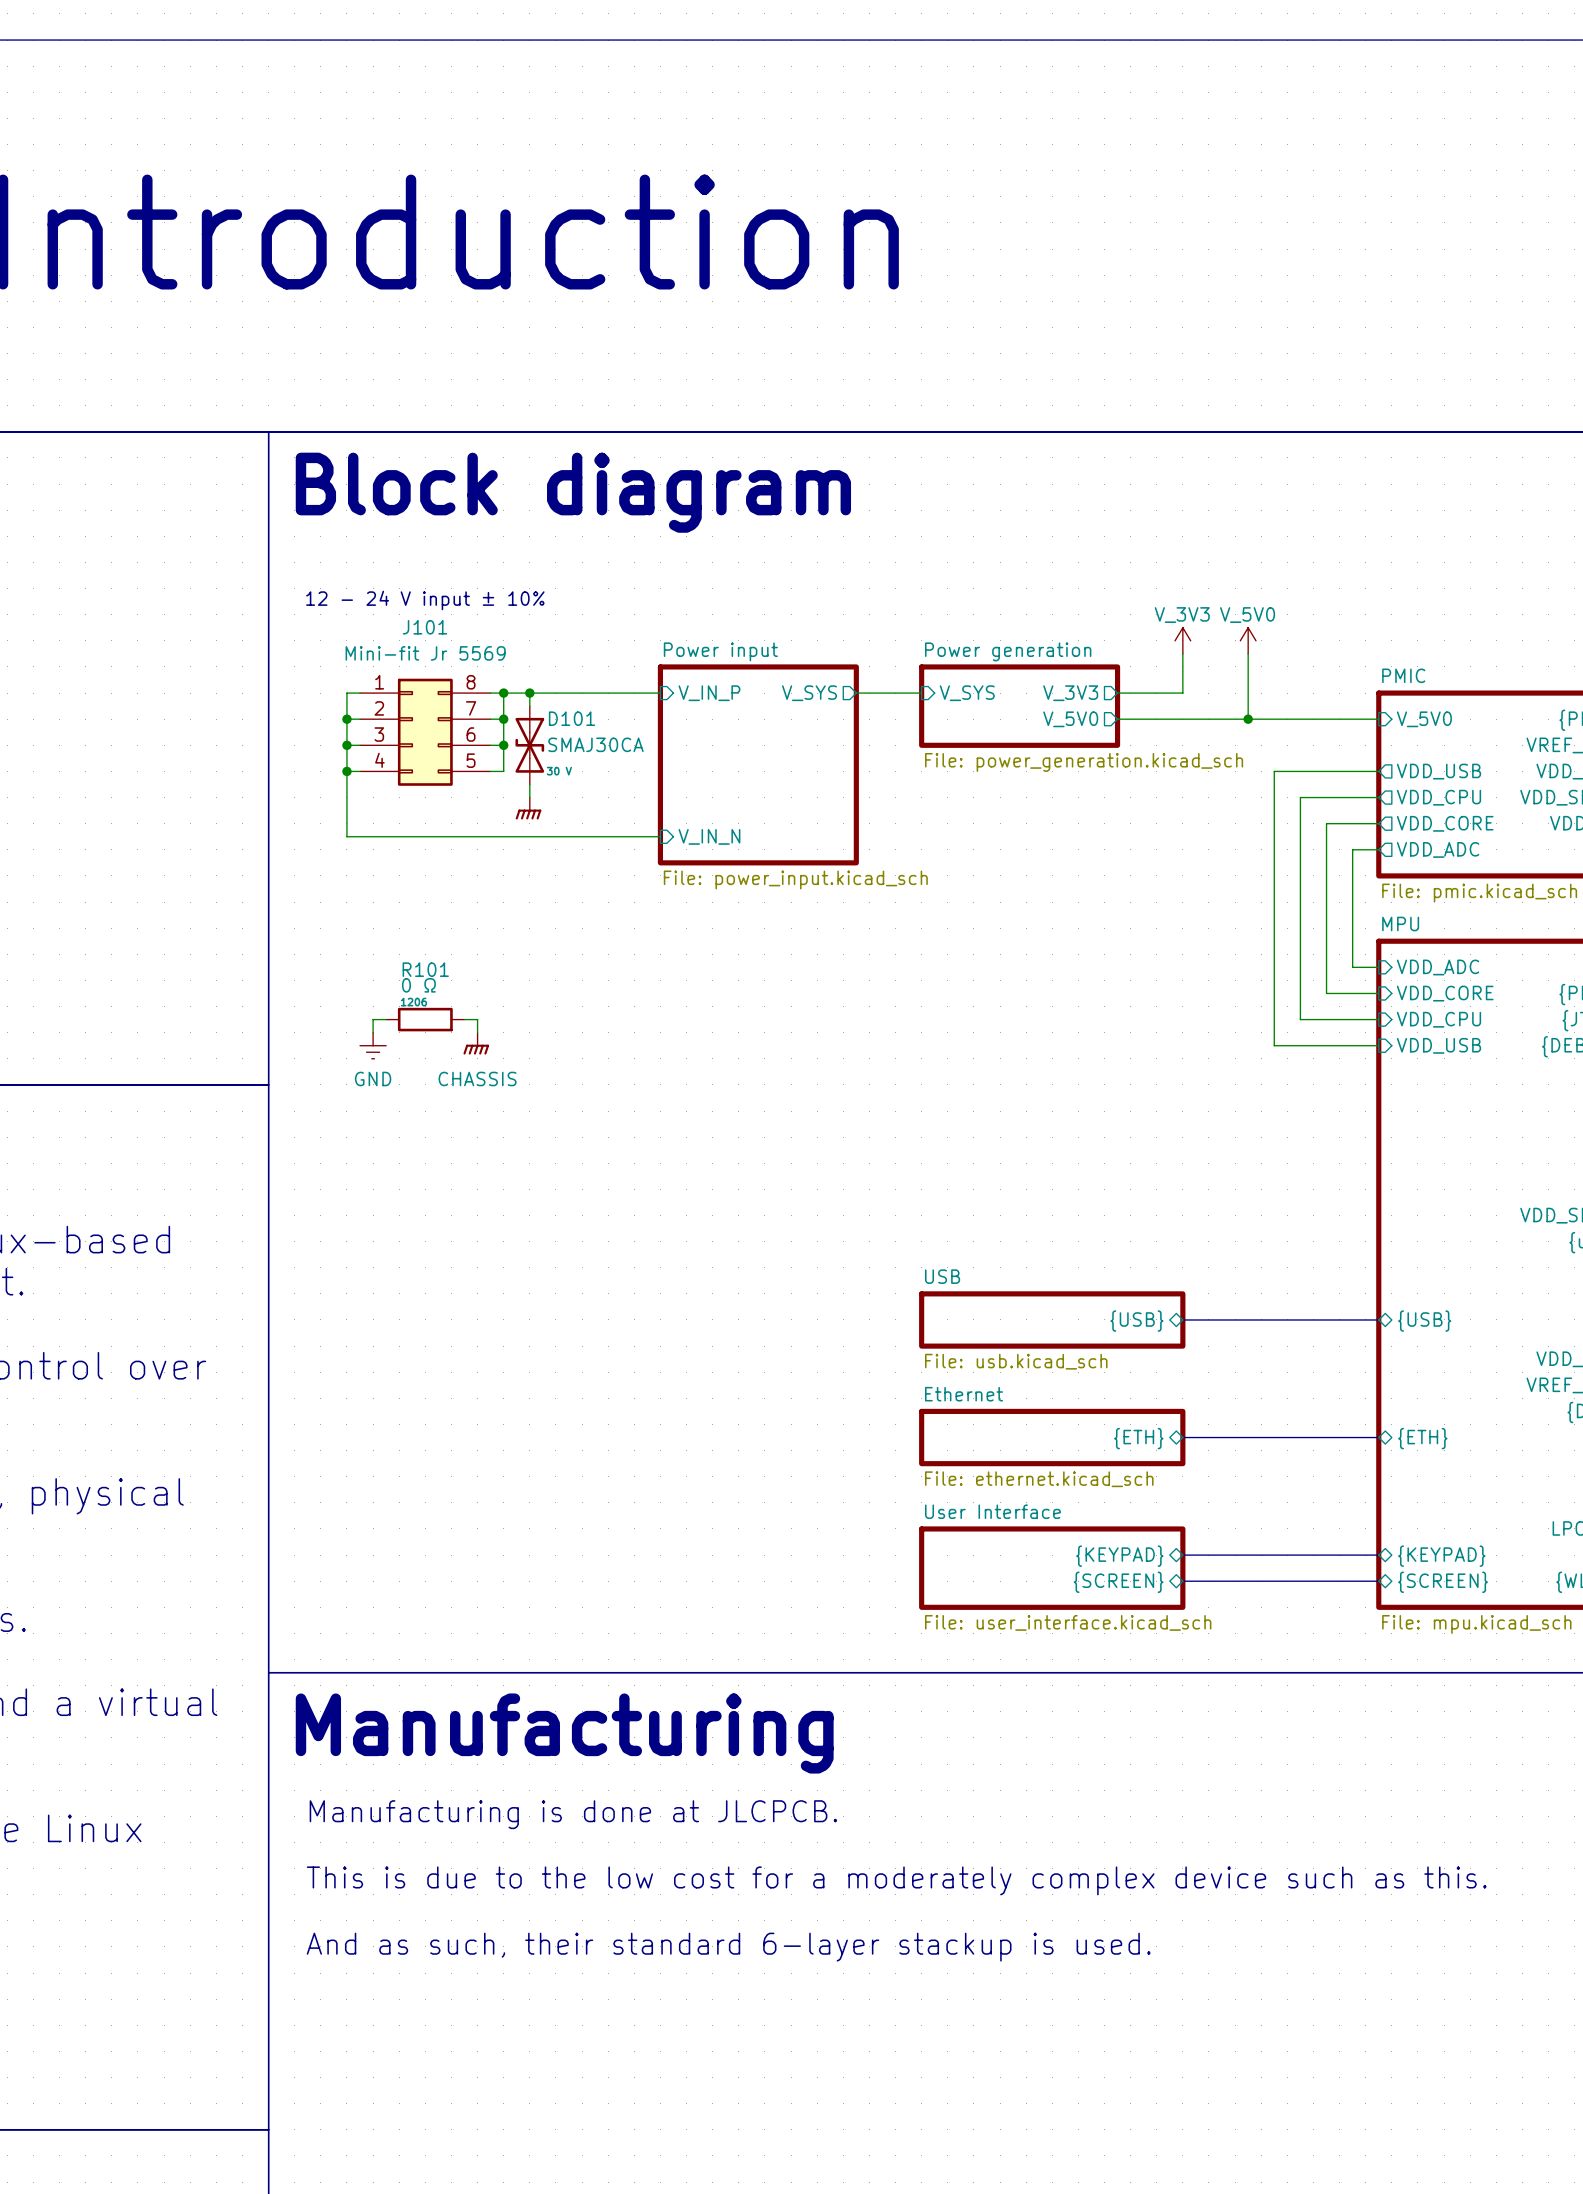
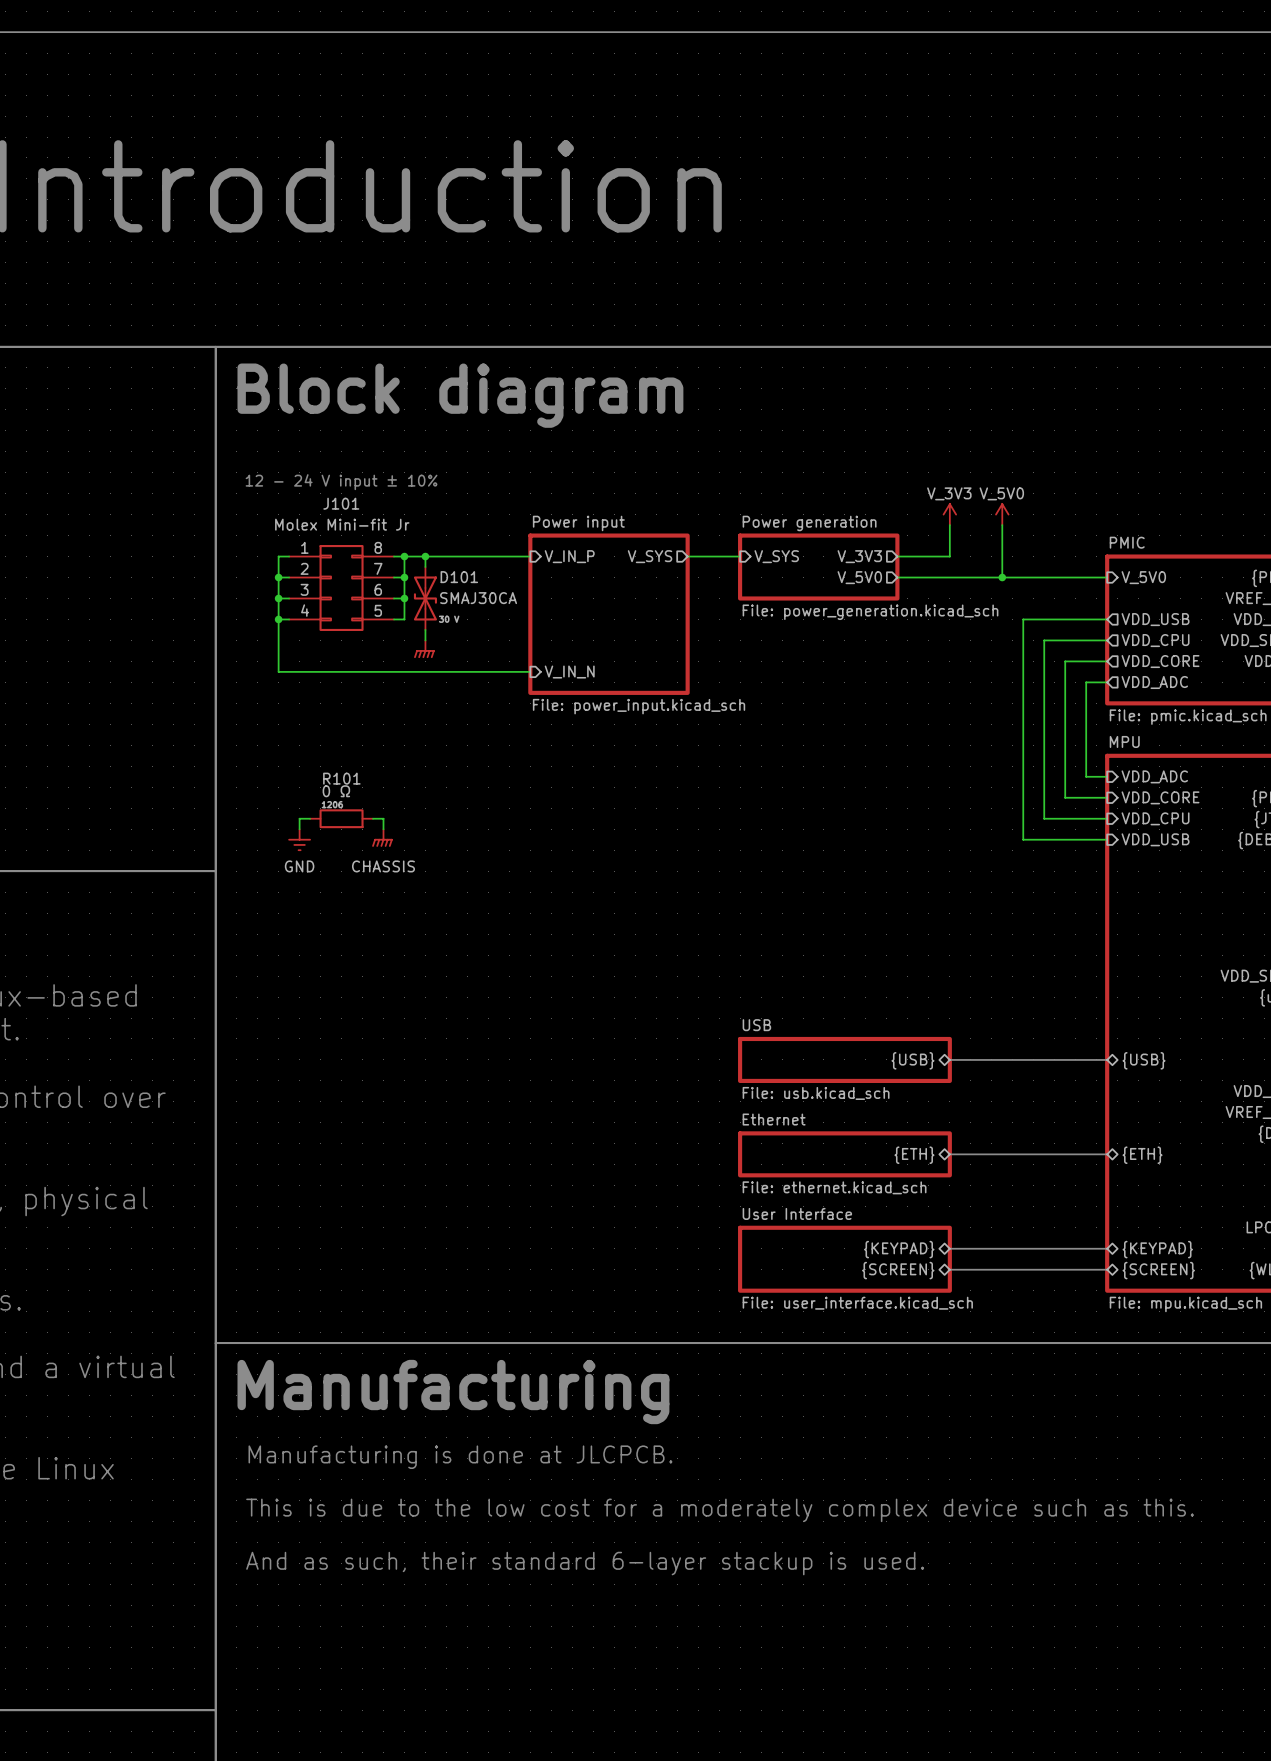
J101 value: Mini-fit Jr 5569 (425, 653) -> Molex Mini-fit Jr (342, 524)

